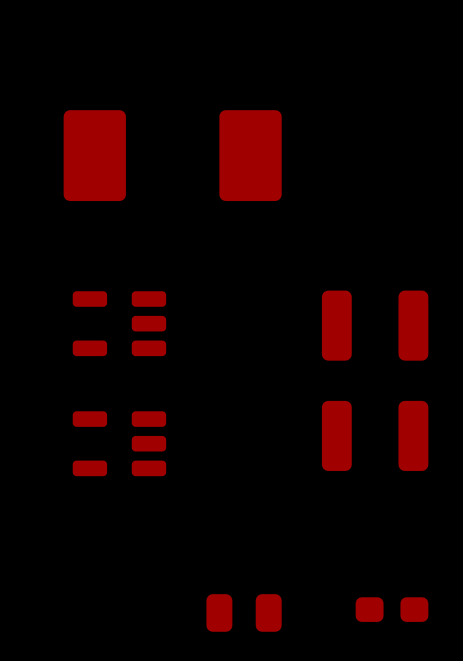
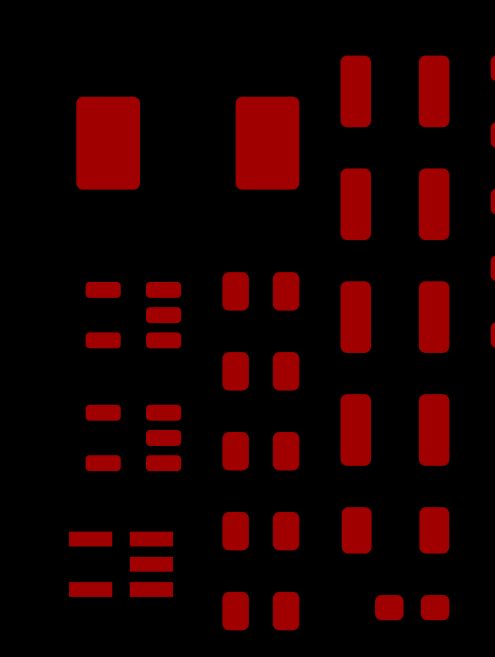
part: none -> (394, 91)
part: none -> (394, 204)
part: none -> (260, 291)
part: none -> (260, 371)
part: none -> (260, 451)
part: none -> (260, 531)
part: none -> (395, 530)
part: none -> (121, 564)

